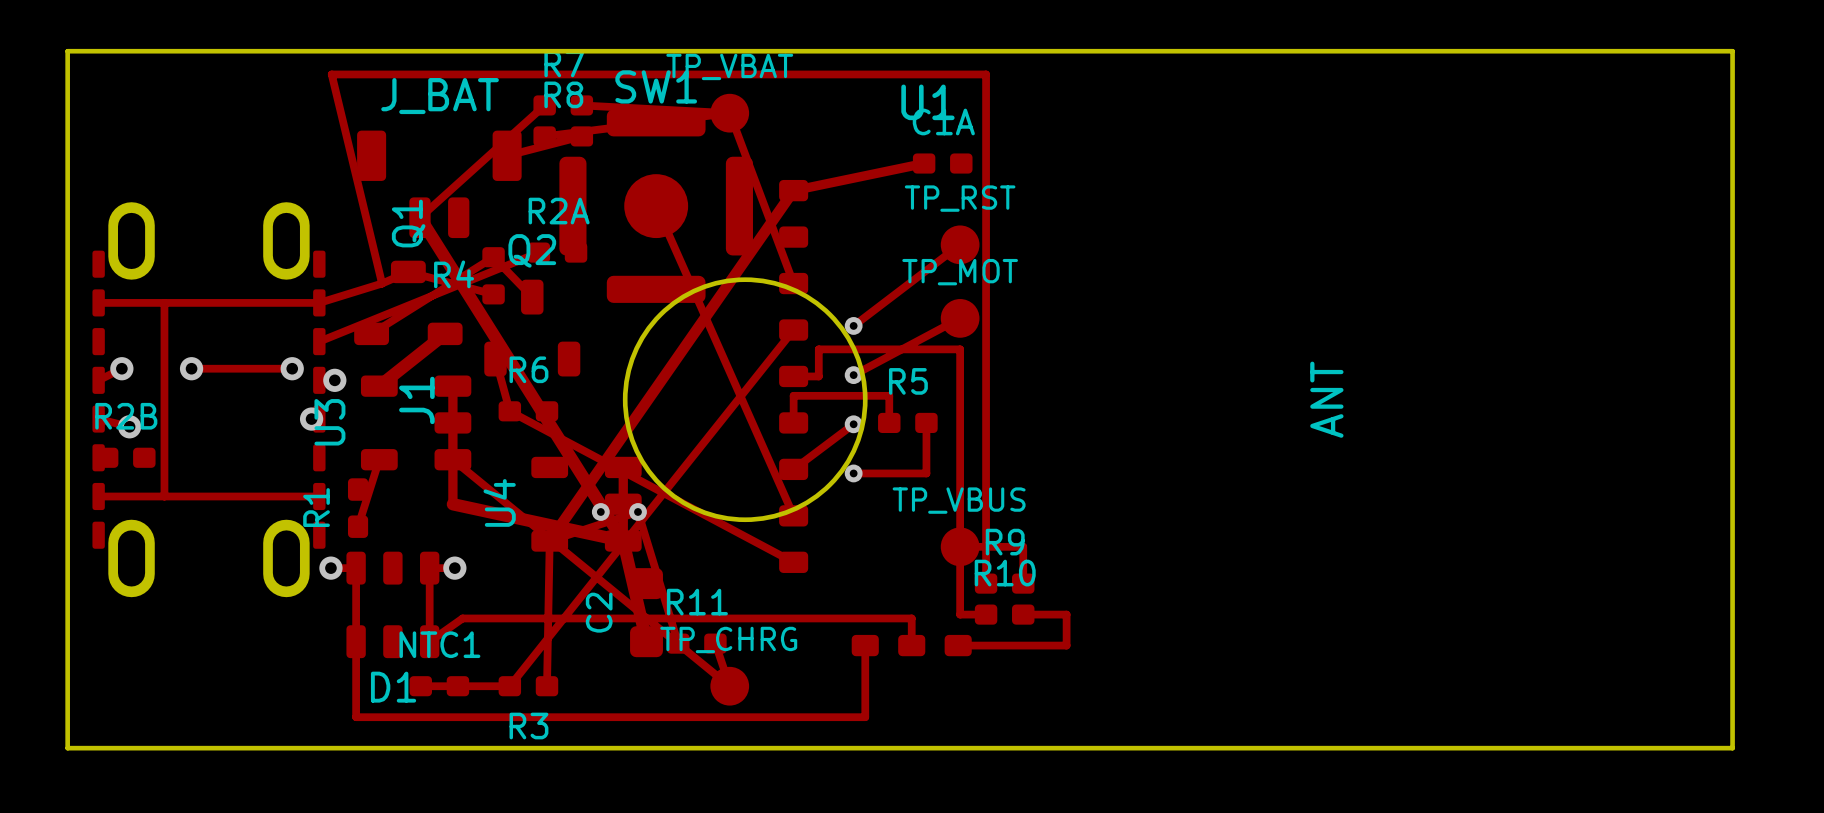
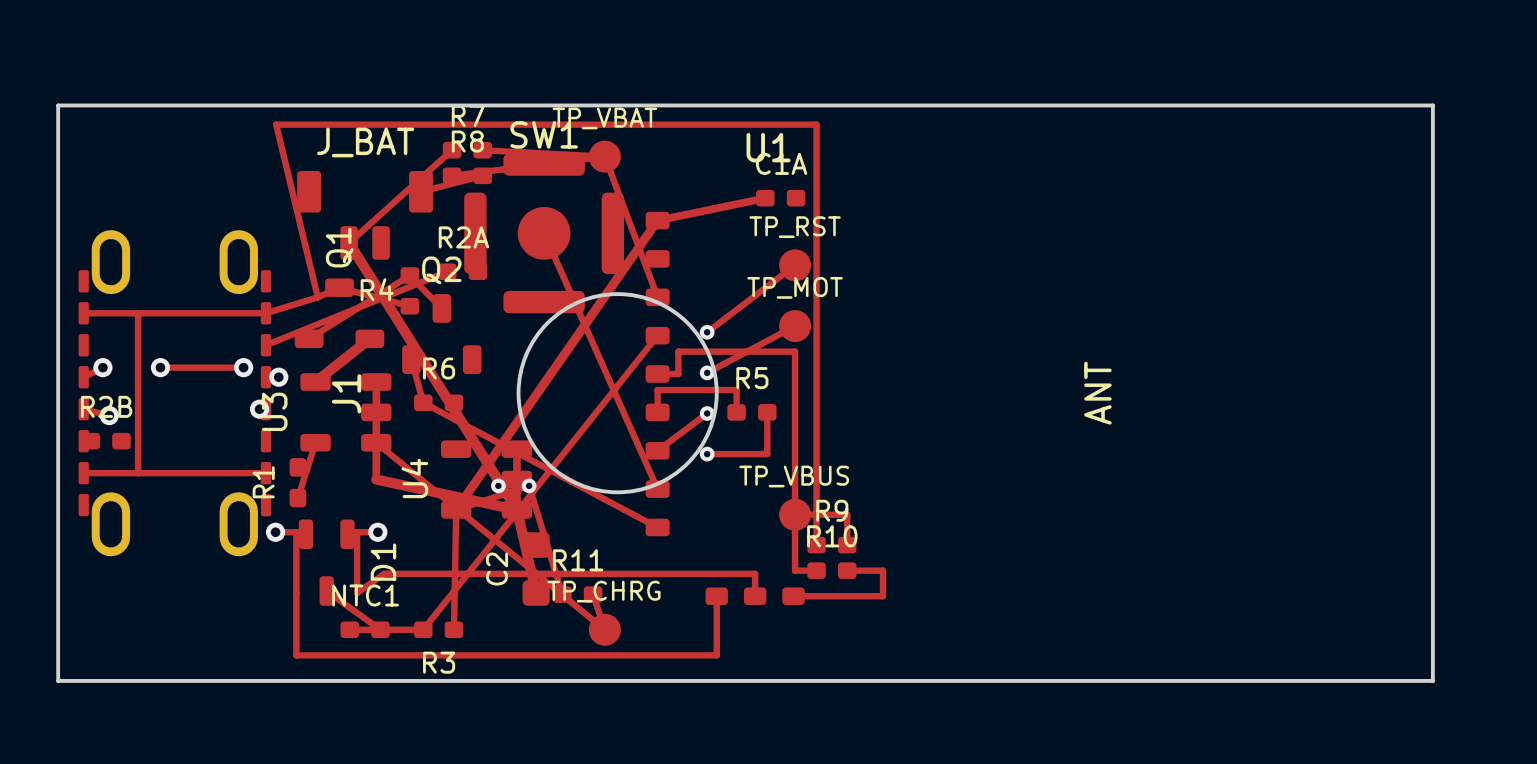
D1 footprint: [346, 551, 440, 659] -> [298, 519, 355, 606]
track: none -> (326, 591) (380, 629)
D1 name rotation: 0° (393, 687) -> 90° counterclockwise (383, 562)
D1 name position: D1 (393, 687) -> D1 (383, 562)

